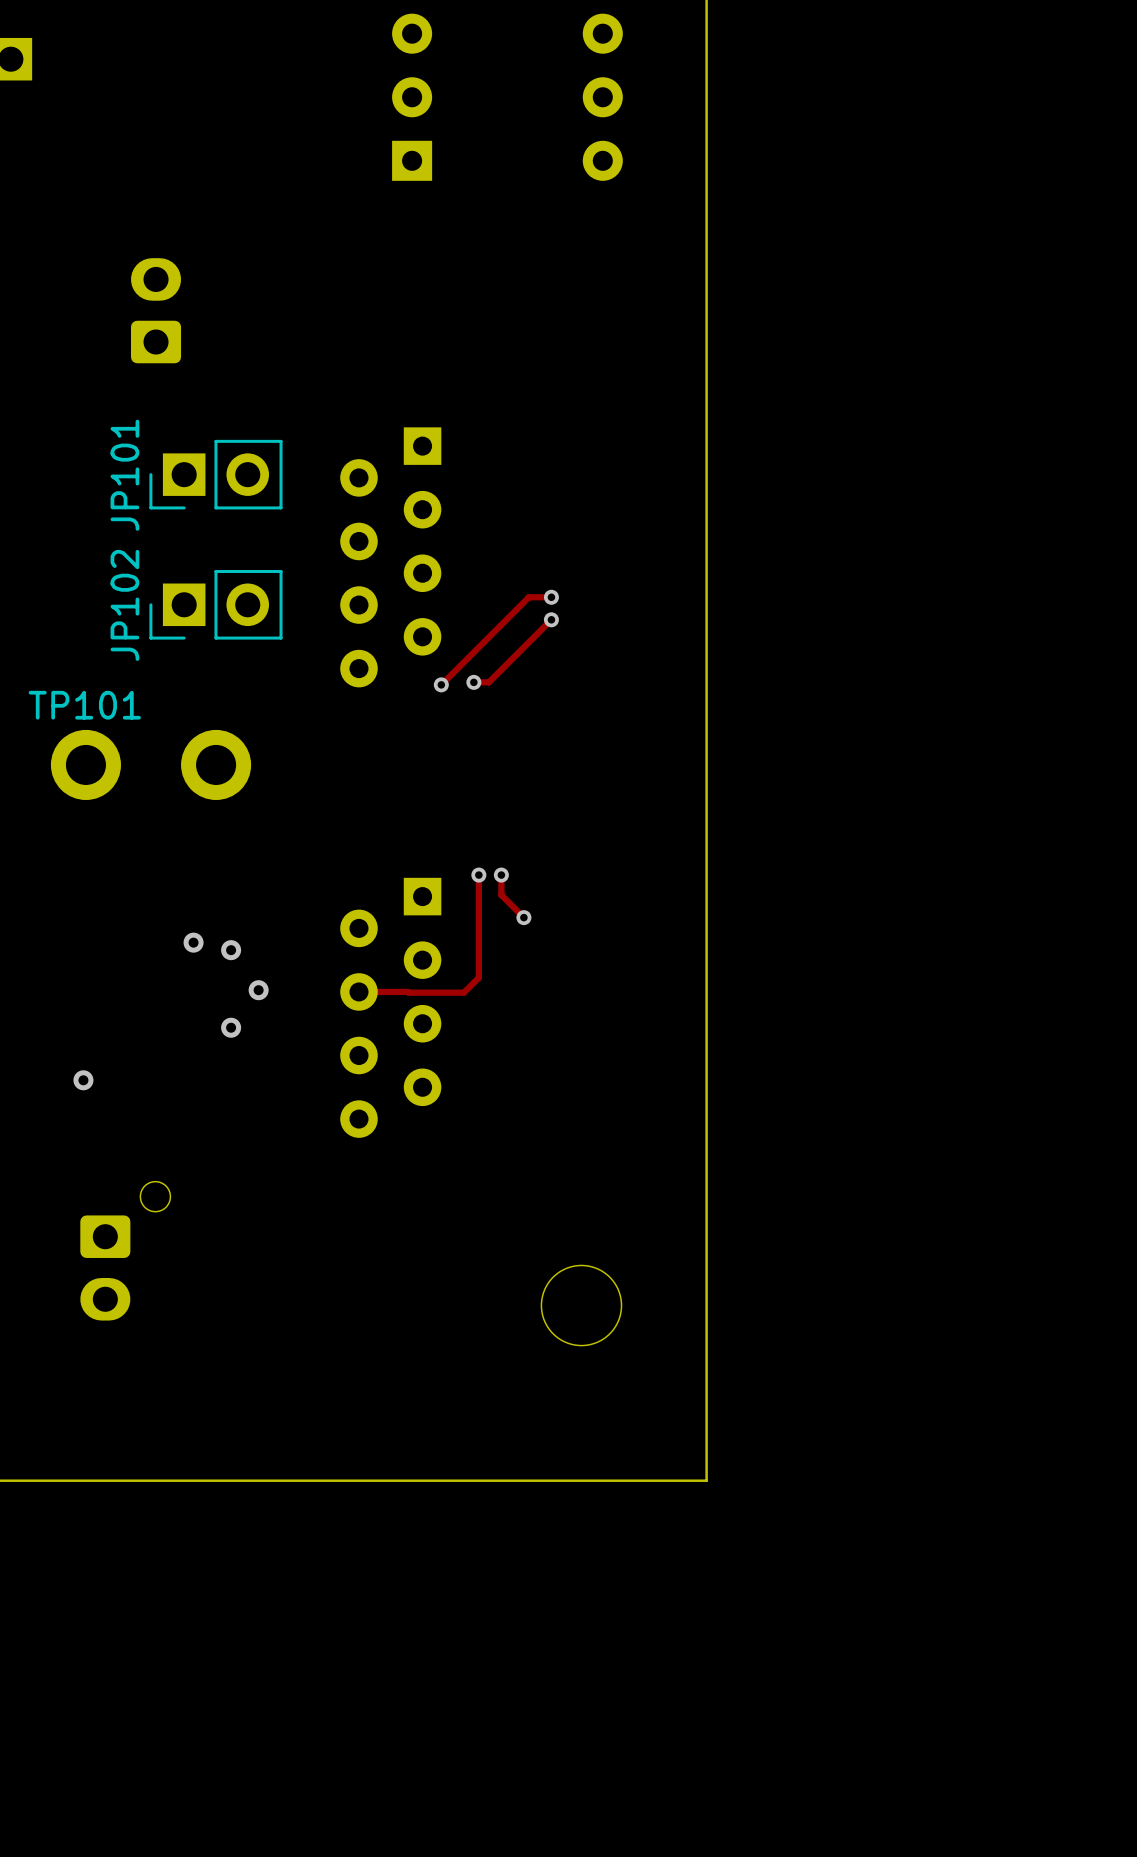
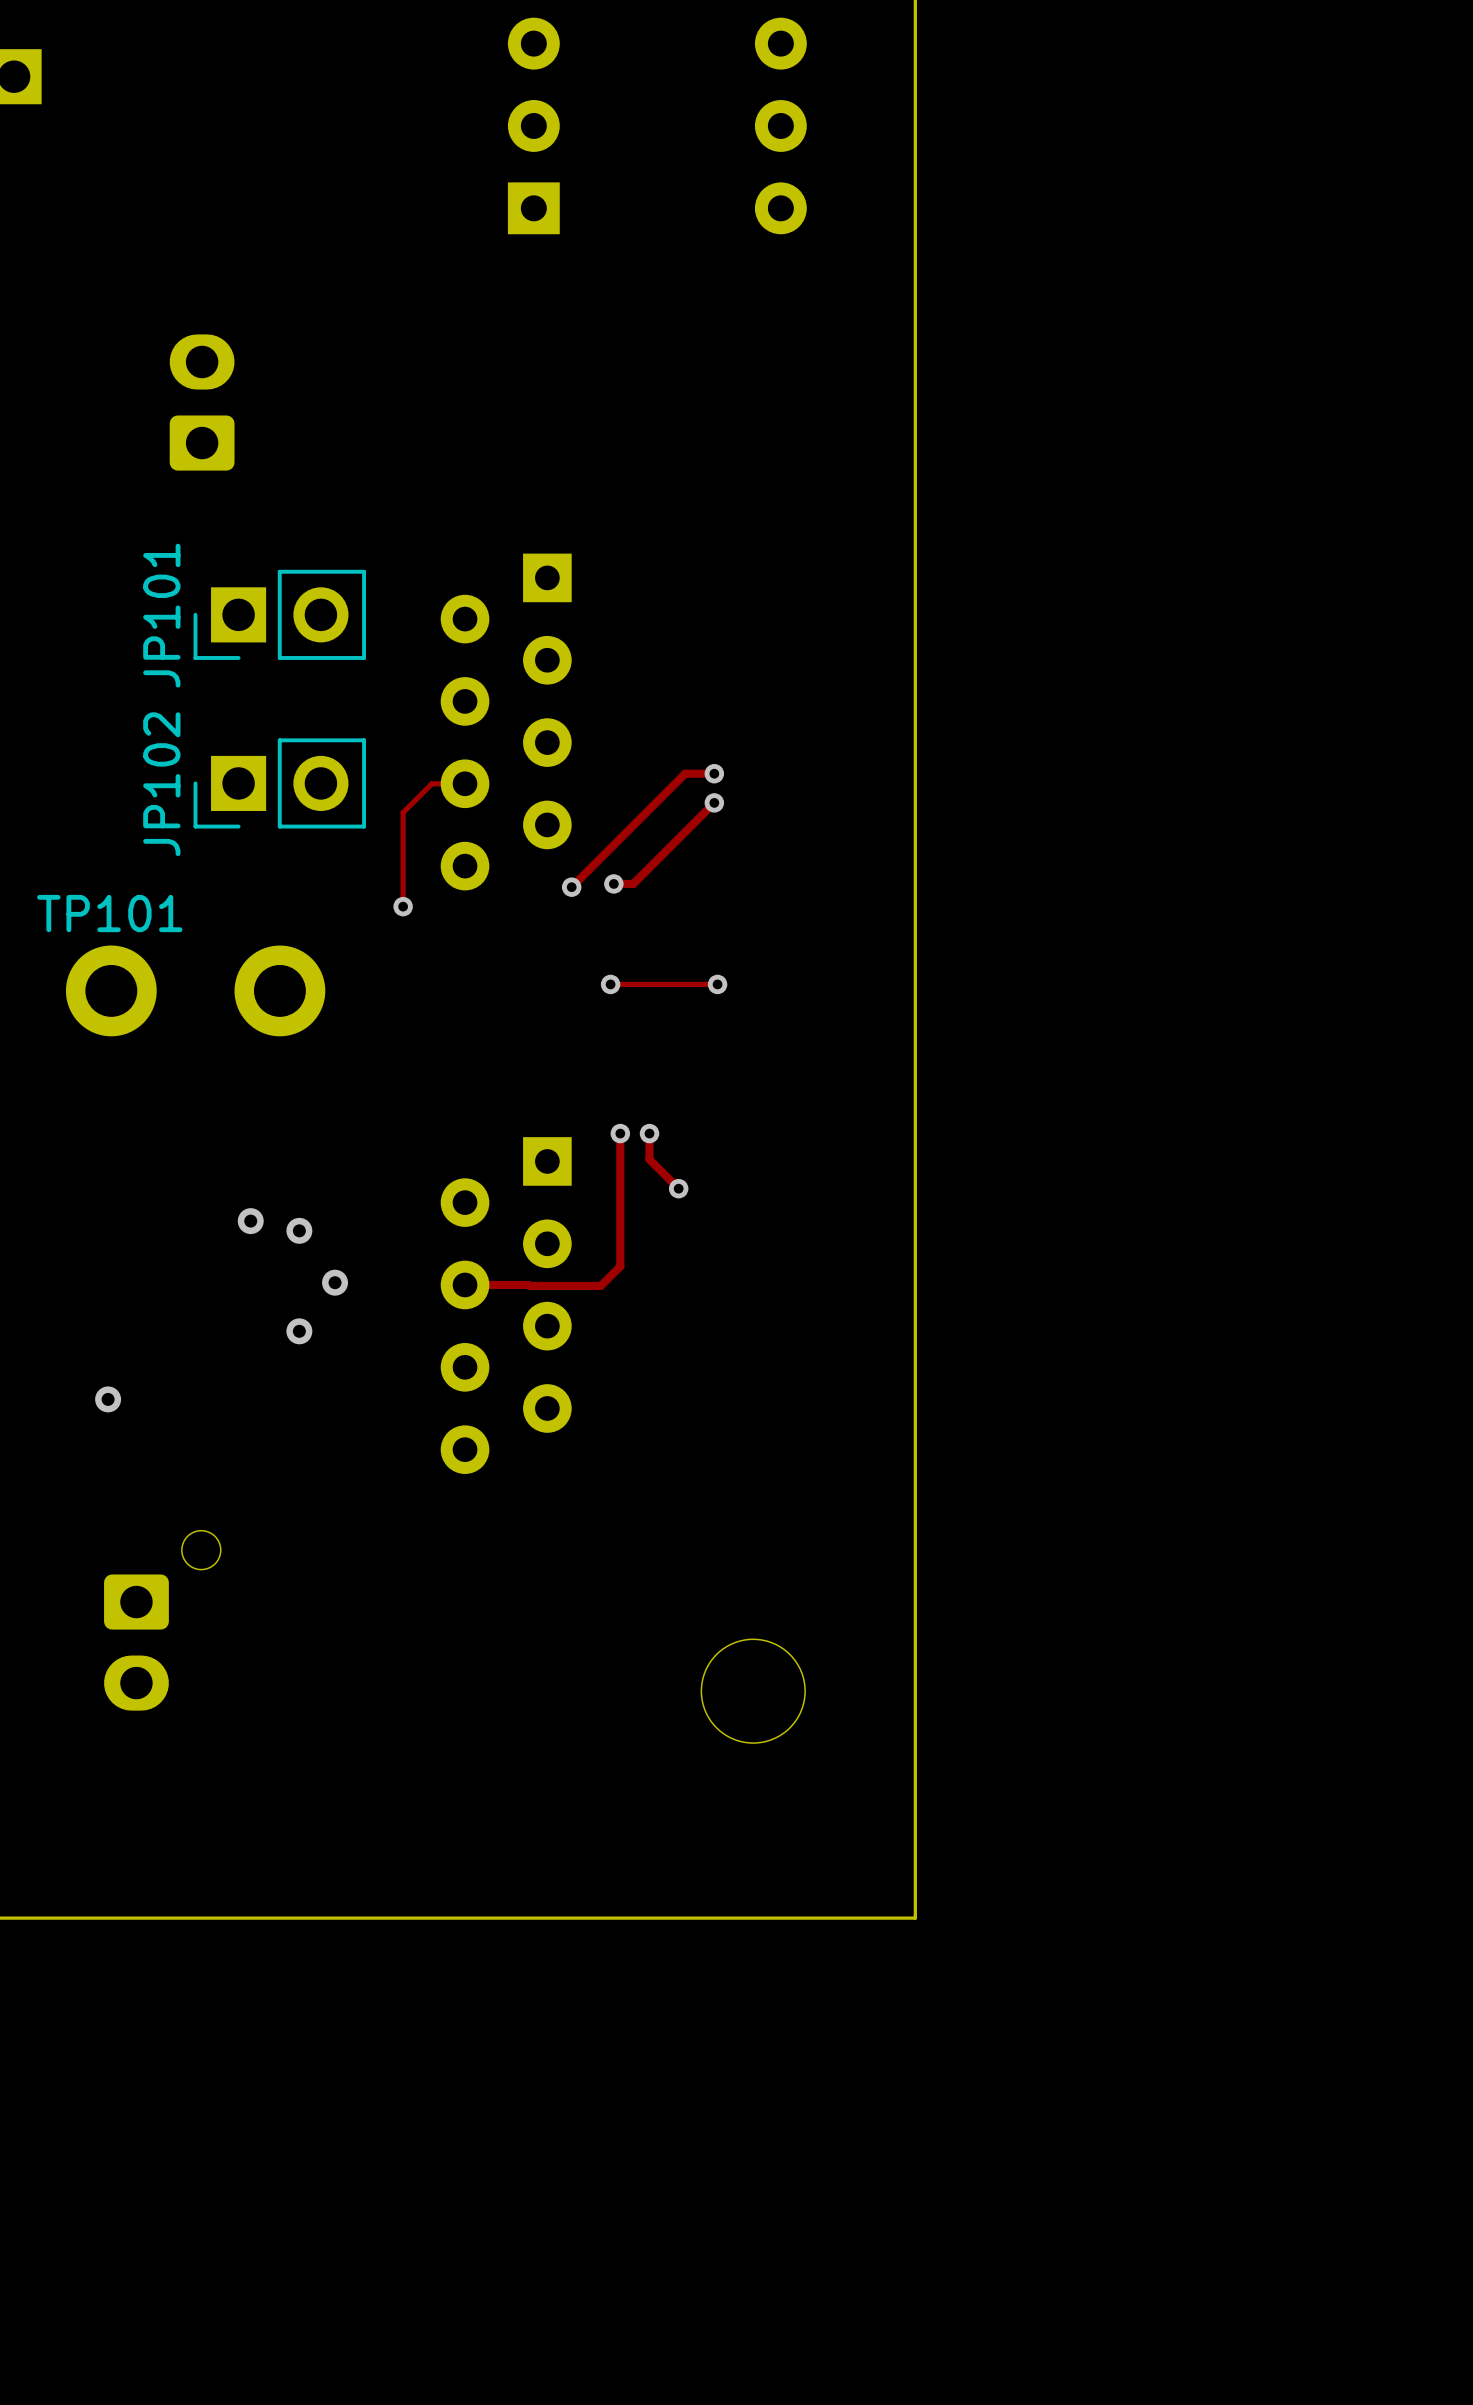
track: none -> (465, 783) (431, 783) (403, 812) (403, 906)
via: none -> (403, 906)
track: none -> (610, 984) (717, 984)
via: none -> (610, 984)
via: none -> (717, 984)

